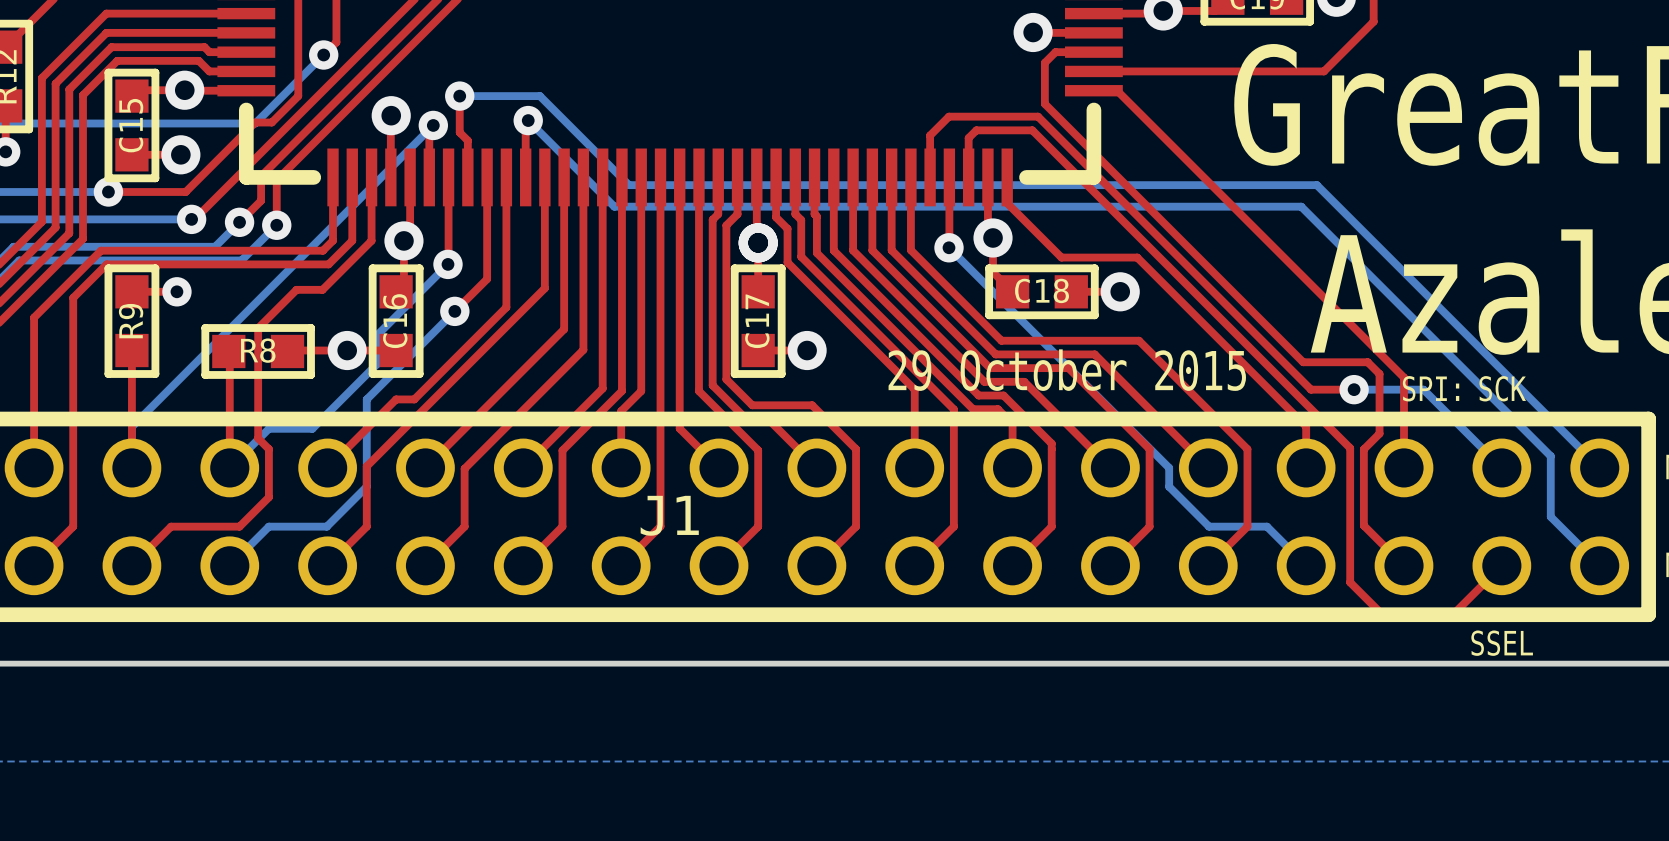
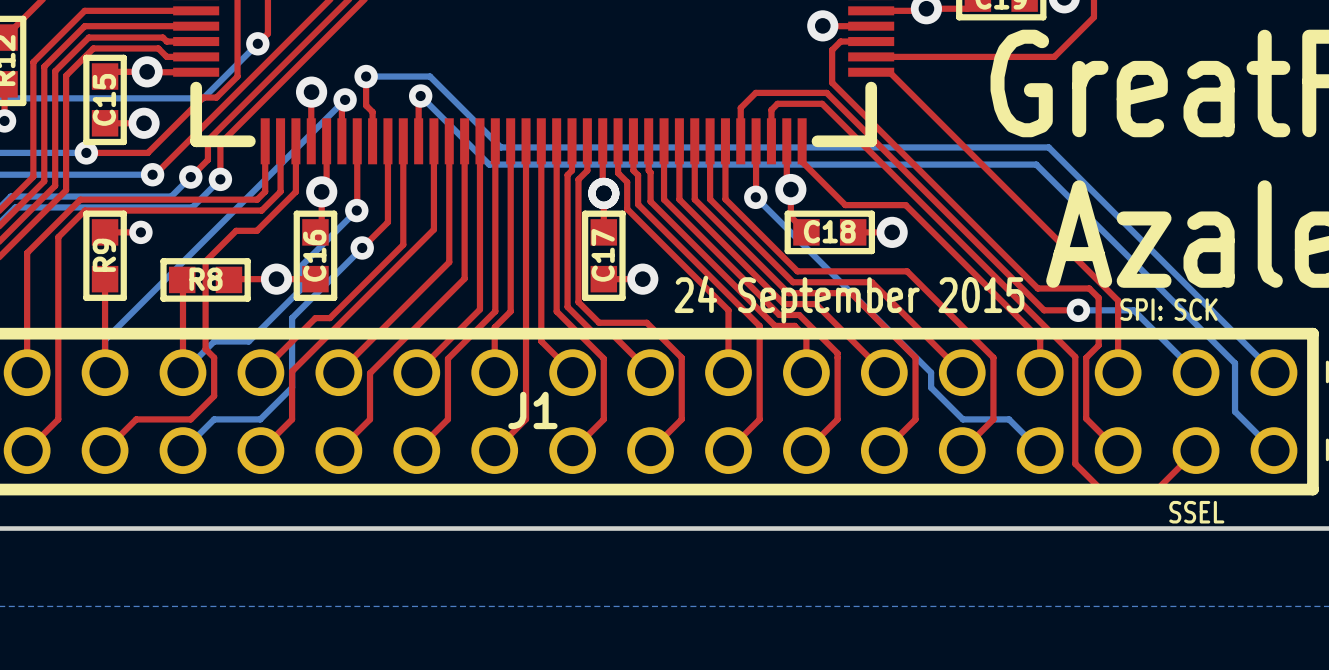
text: 29 October 2015 (1067, 370) -> 24 September 2015 (849, 299)

